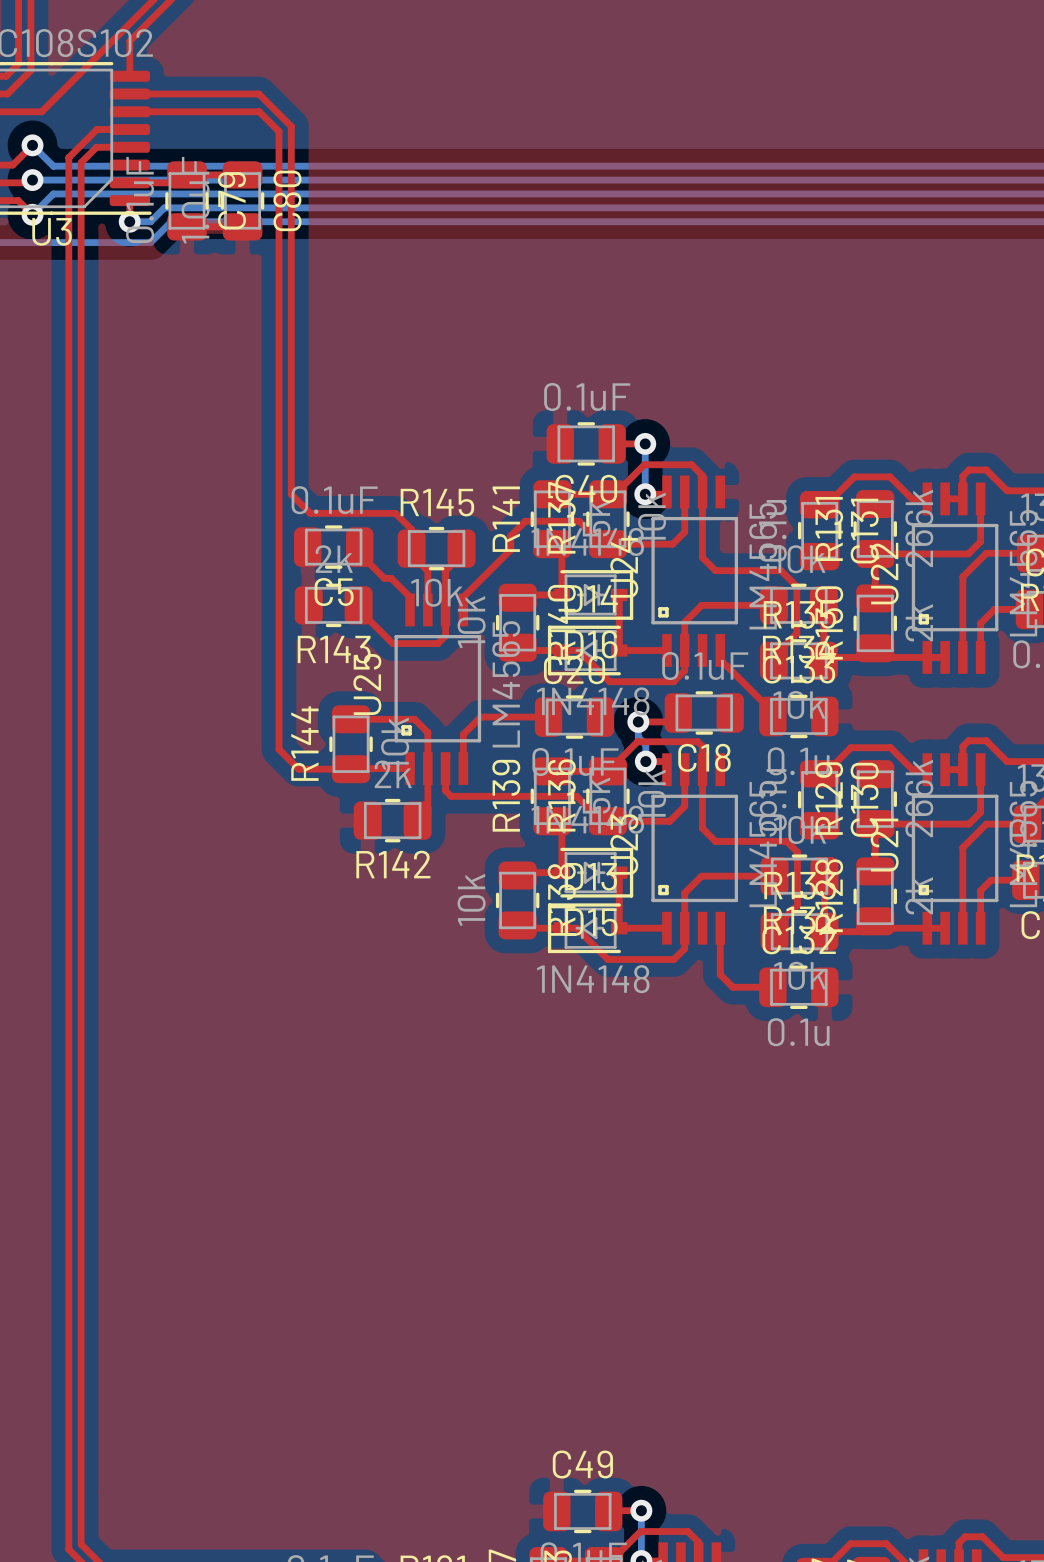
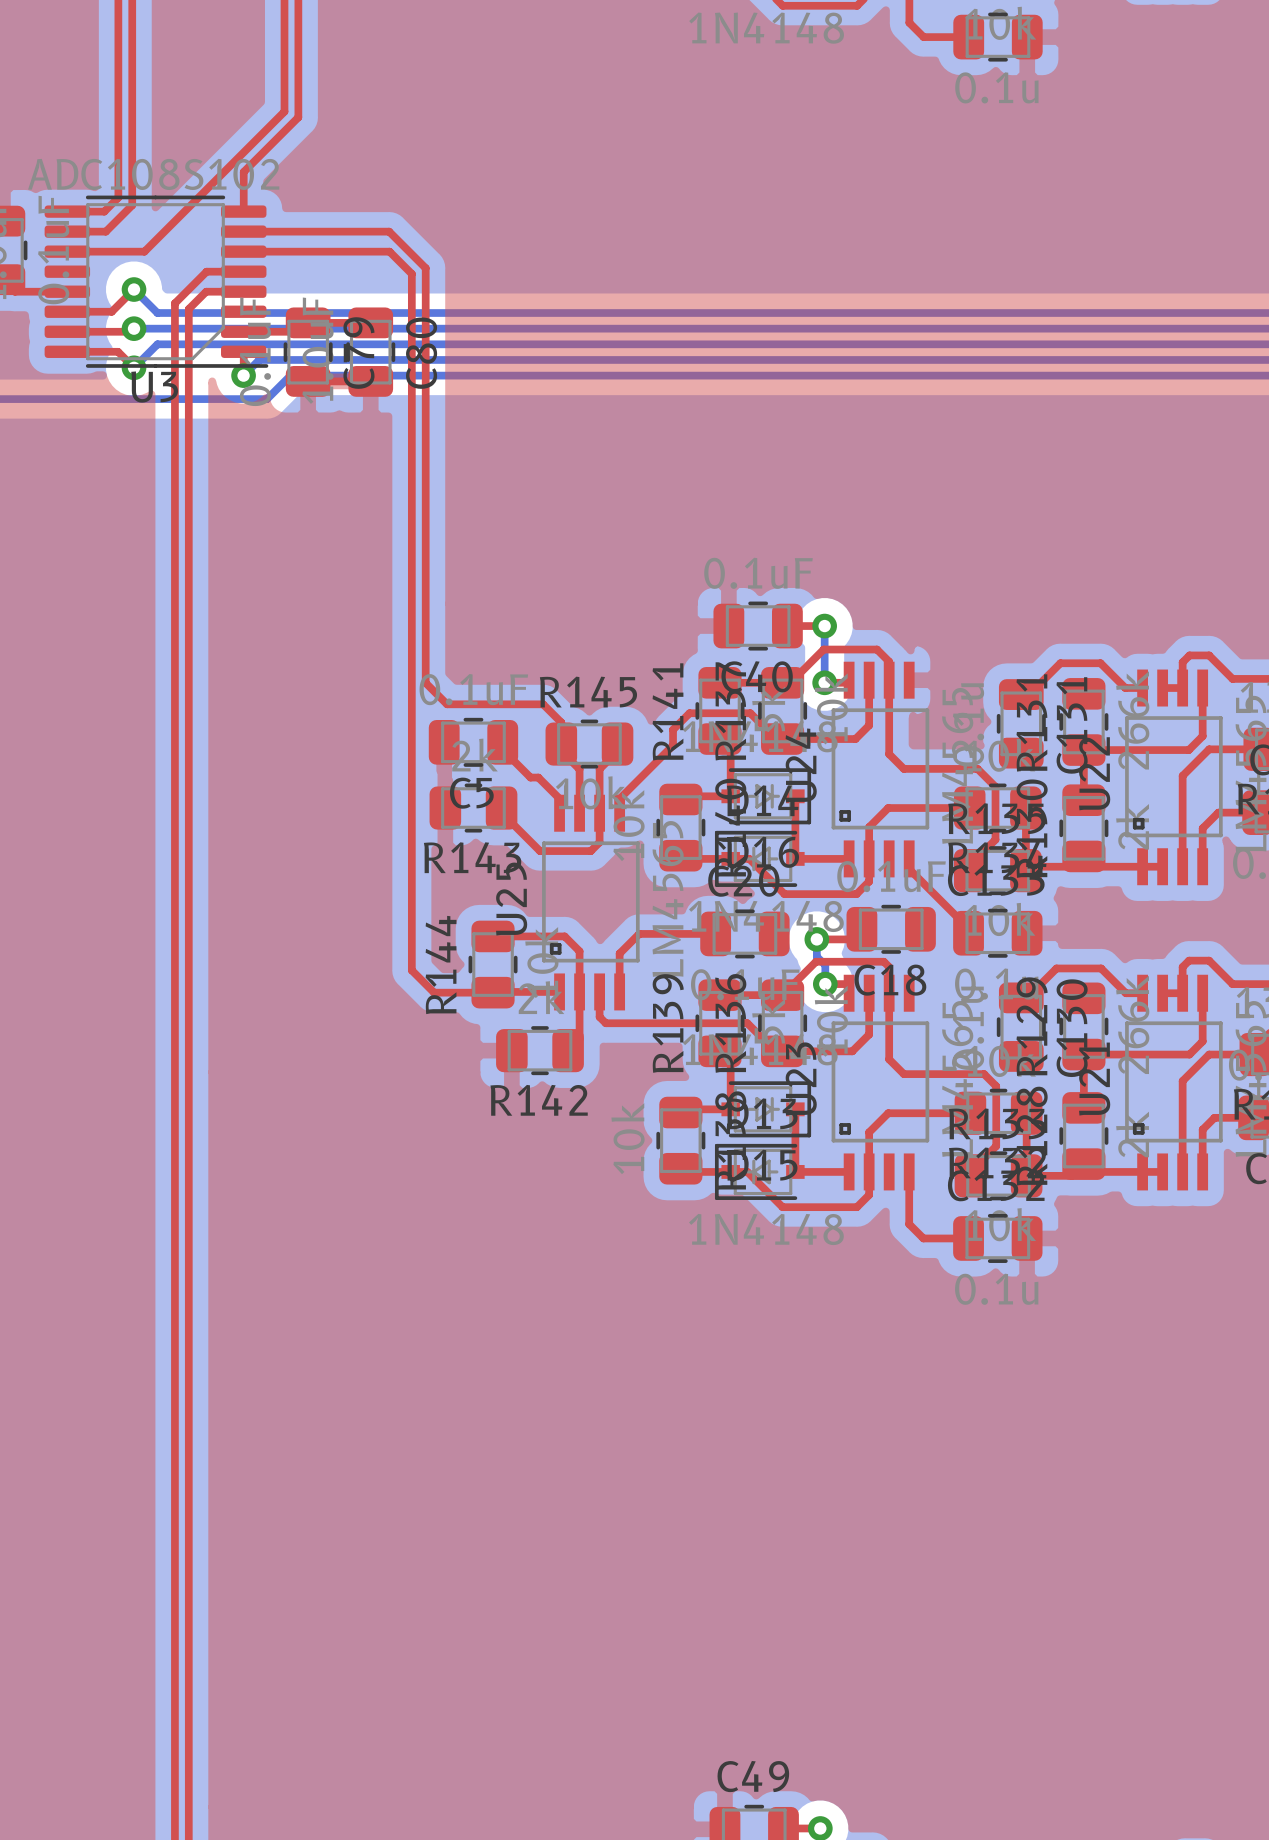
bottom track: (164, 207) (150, 221) (129, 221) -> (282, 359) (259, 359) (243, 375)

